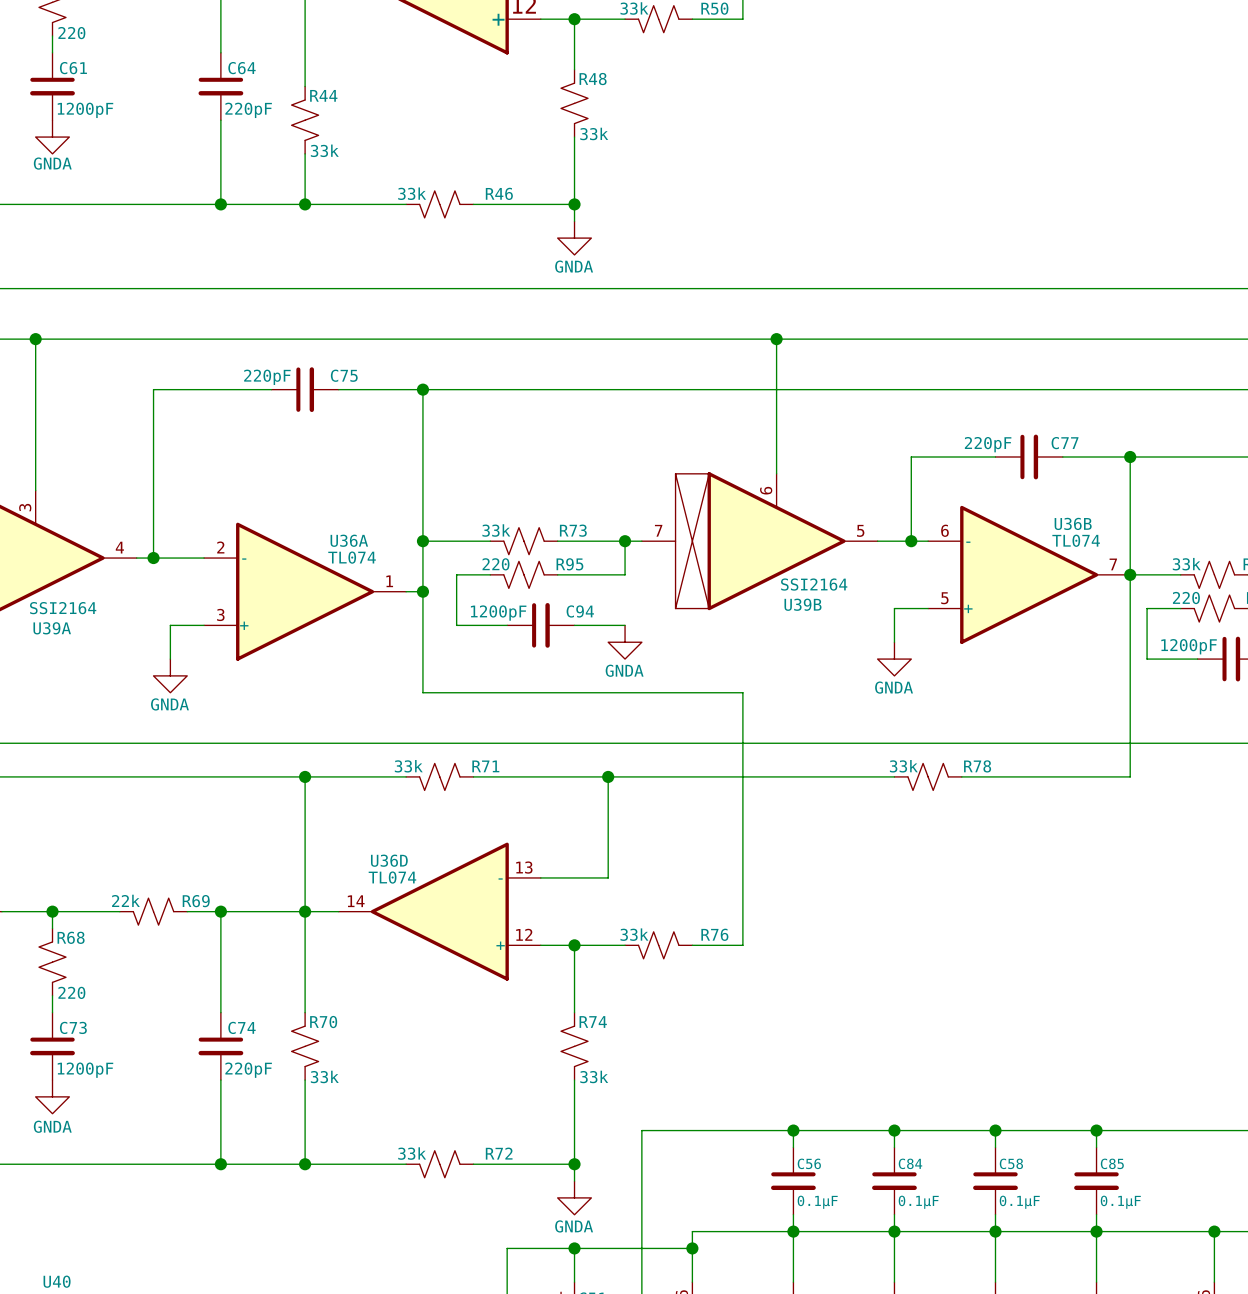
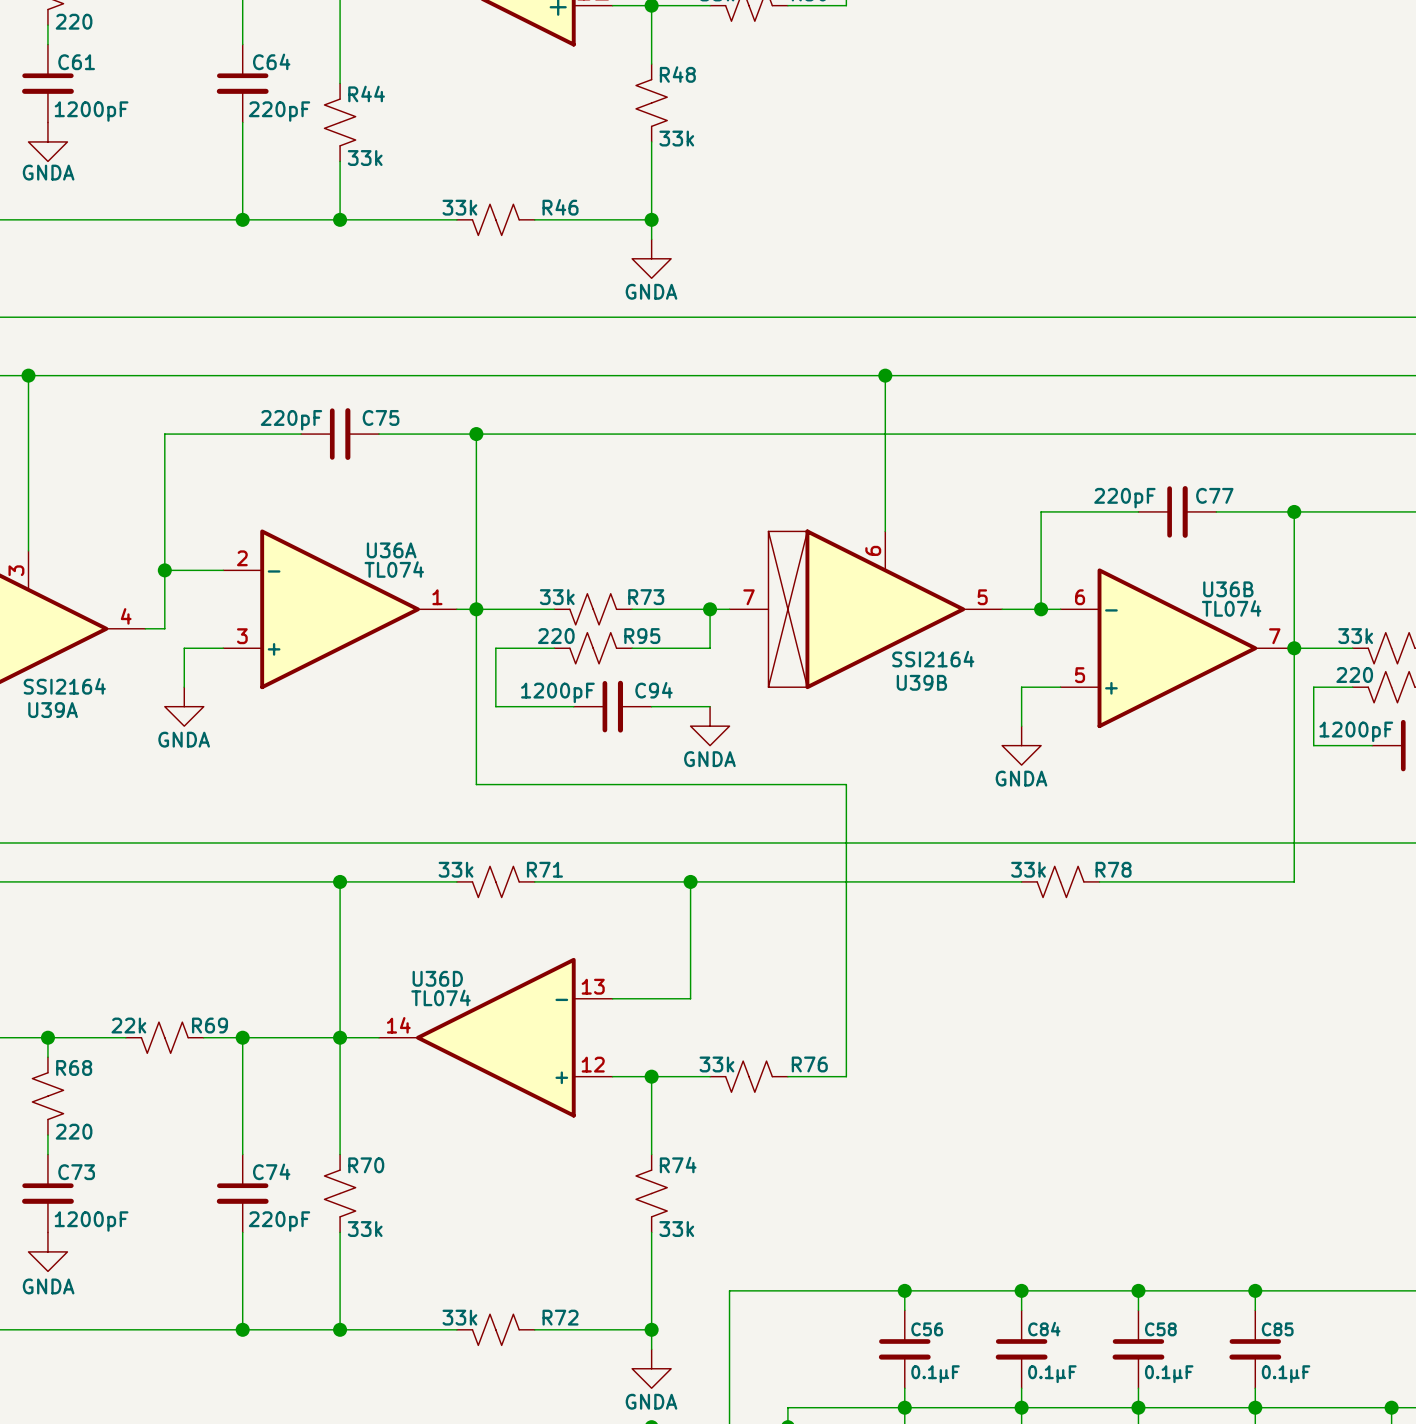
wire: (153, 558) (204, 558) -> (164, 570) (223, 570)
junction position: (153, 558) -> (164, 570)
wire: (456, 574) (456, 625) -> (515, 648) (495, 648) (495, 706) (515, 706)
U36A position: (305, 591) -> (340, 609)
wire: (406, 591) (422, 591) -> (456, 609) (476, 609)
junction: (422, 591) -> none
wire: (204, 625) (170, 625) (170, 659) -> (223, 648) (184, 648) (184, 687)
power symbol position: GNDA (170, 675) -> GNDA (184, 706)

